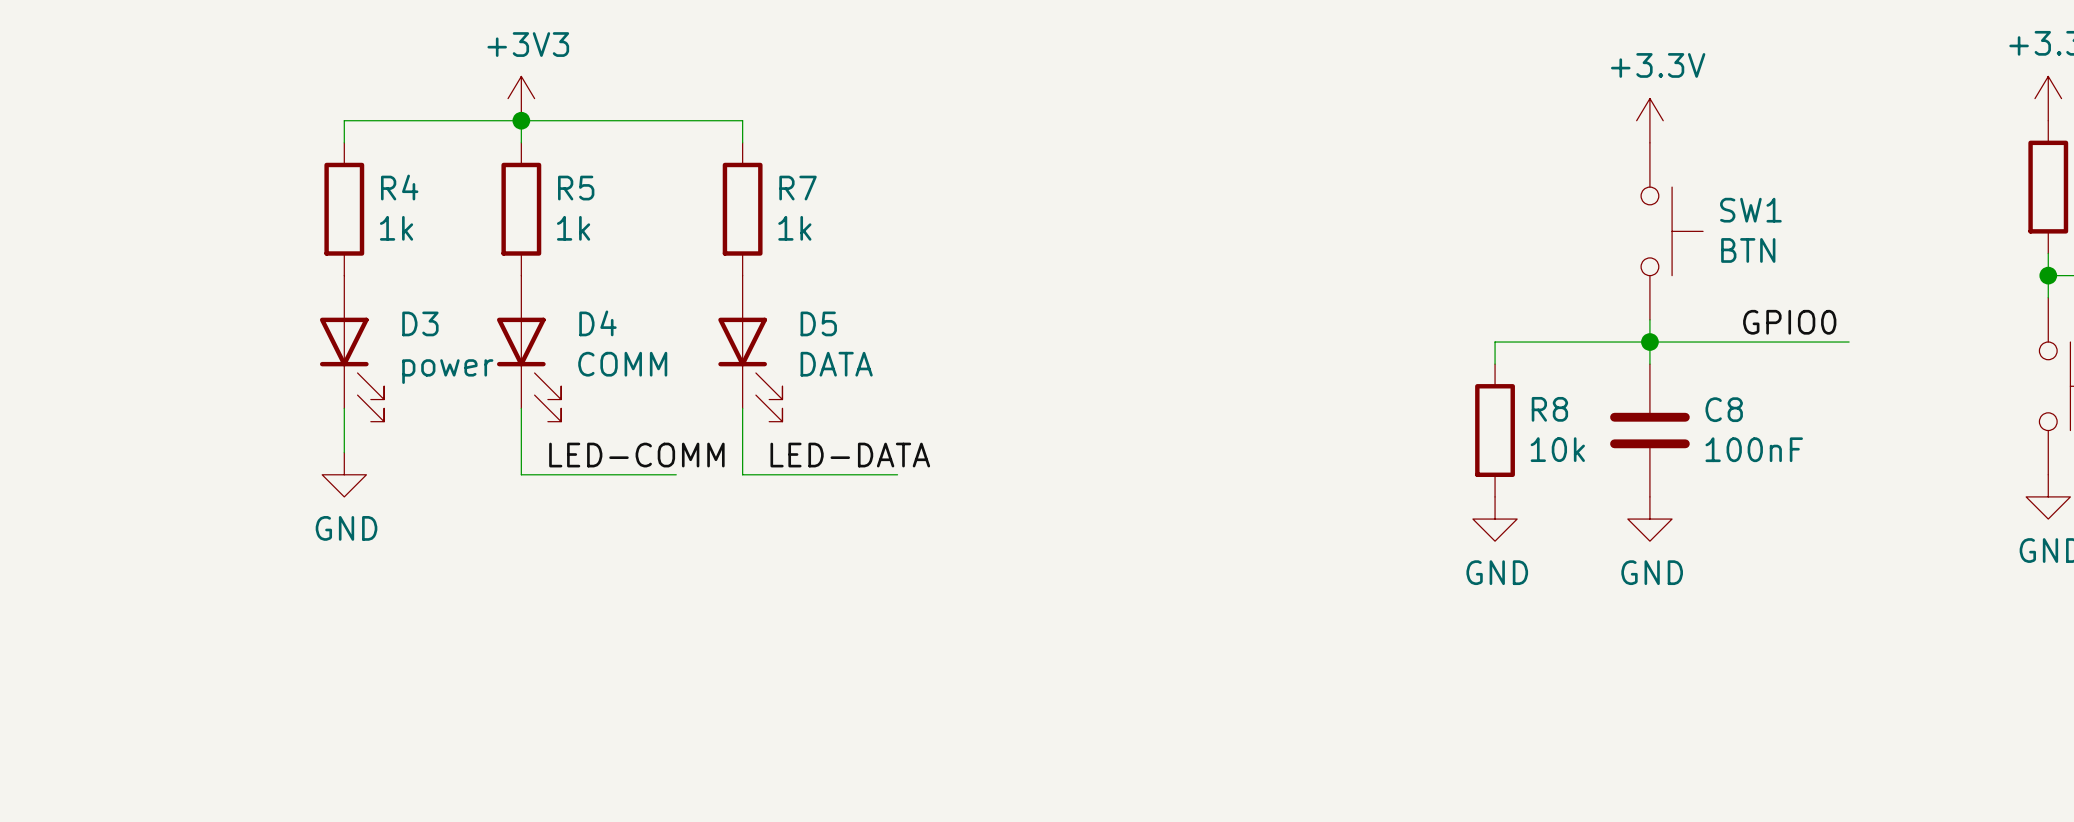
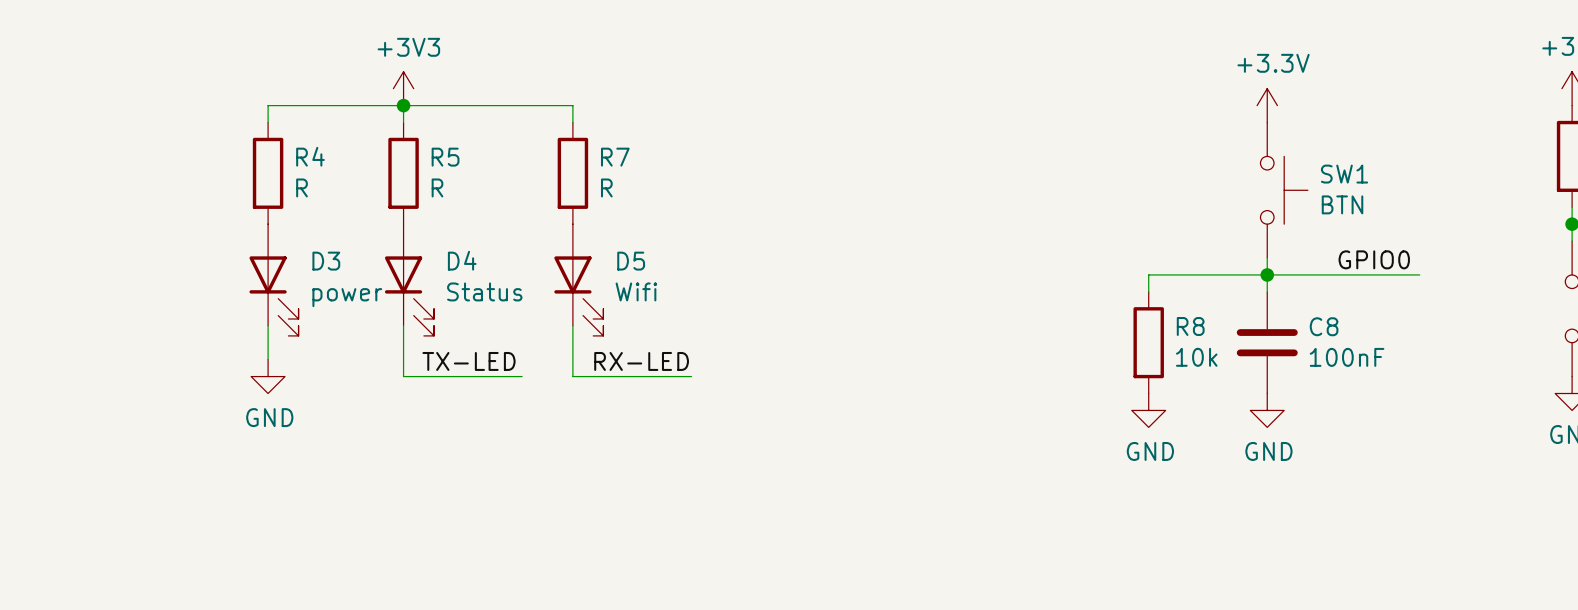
R4 value: 1k (396, 228) -> R (302, 187)
R5 value: 1k (573, 228) -> R (437, 187)
R7 value: 1k (794, 228) -> R (606, 187)
D4 value: COMM (622, 364) -> Status (484, 291)
D5 value: DATA (836, 364) -> Wifi (636, 291)
label: LED-COMM (636, 455) -> TX-LED (469, 361)
label: LED-DATA (850, 455) -> RX-LED (641, 361)

